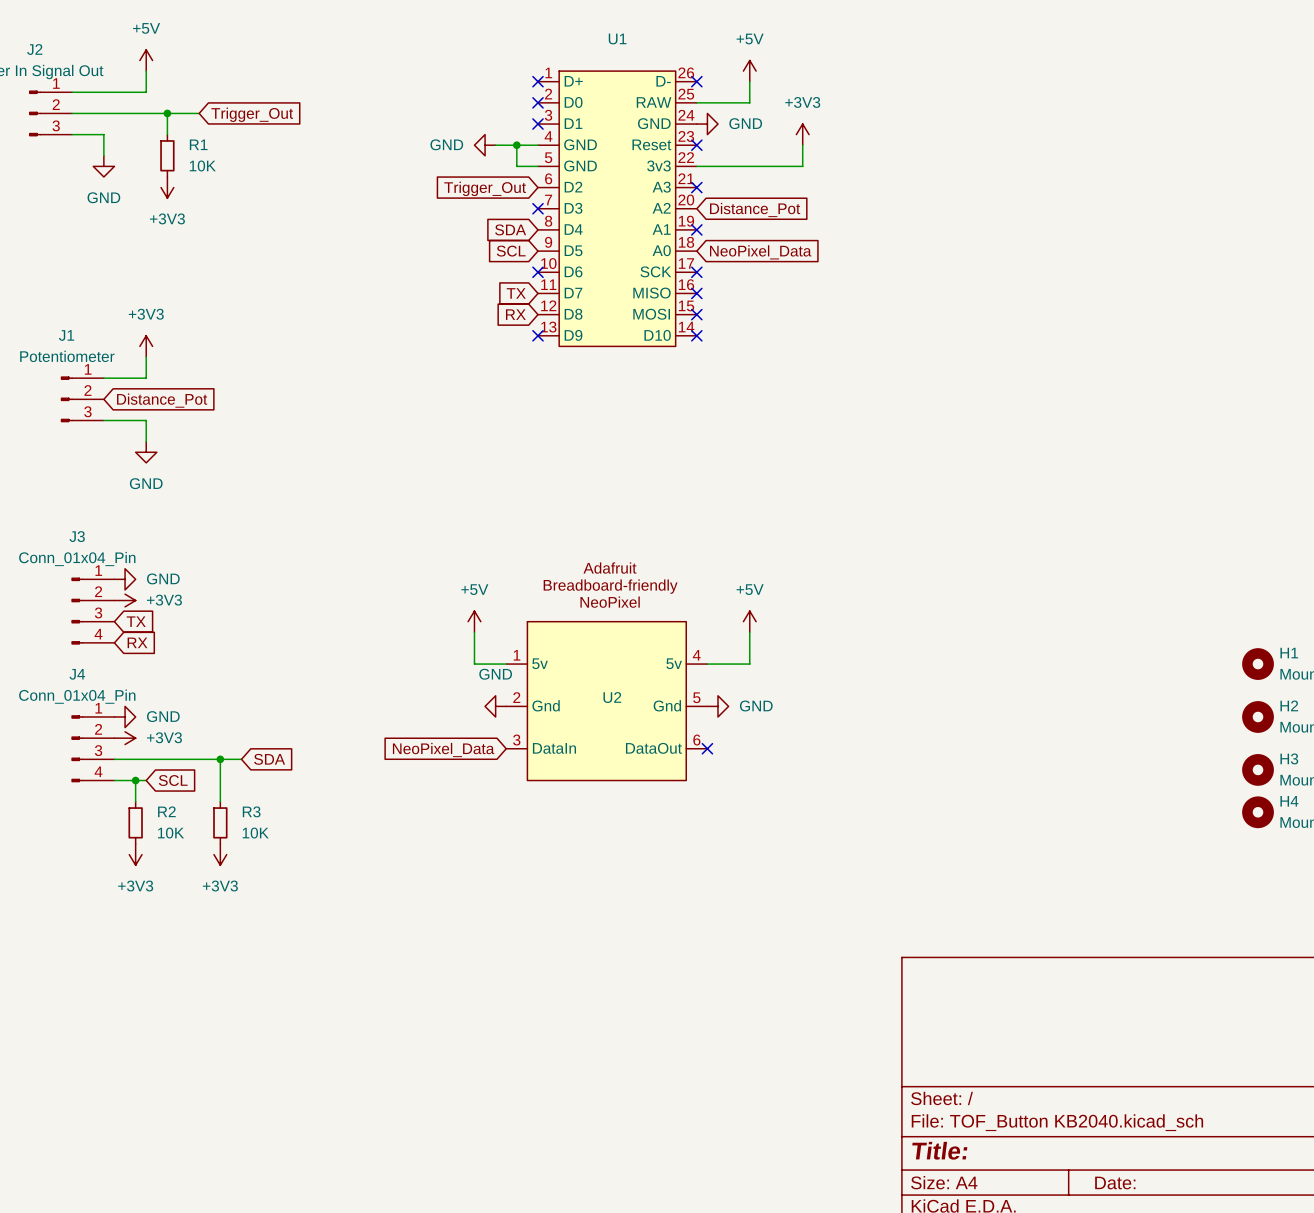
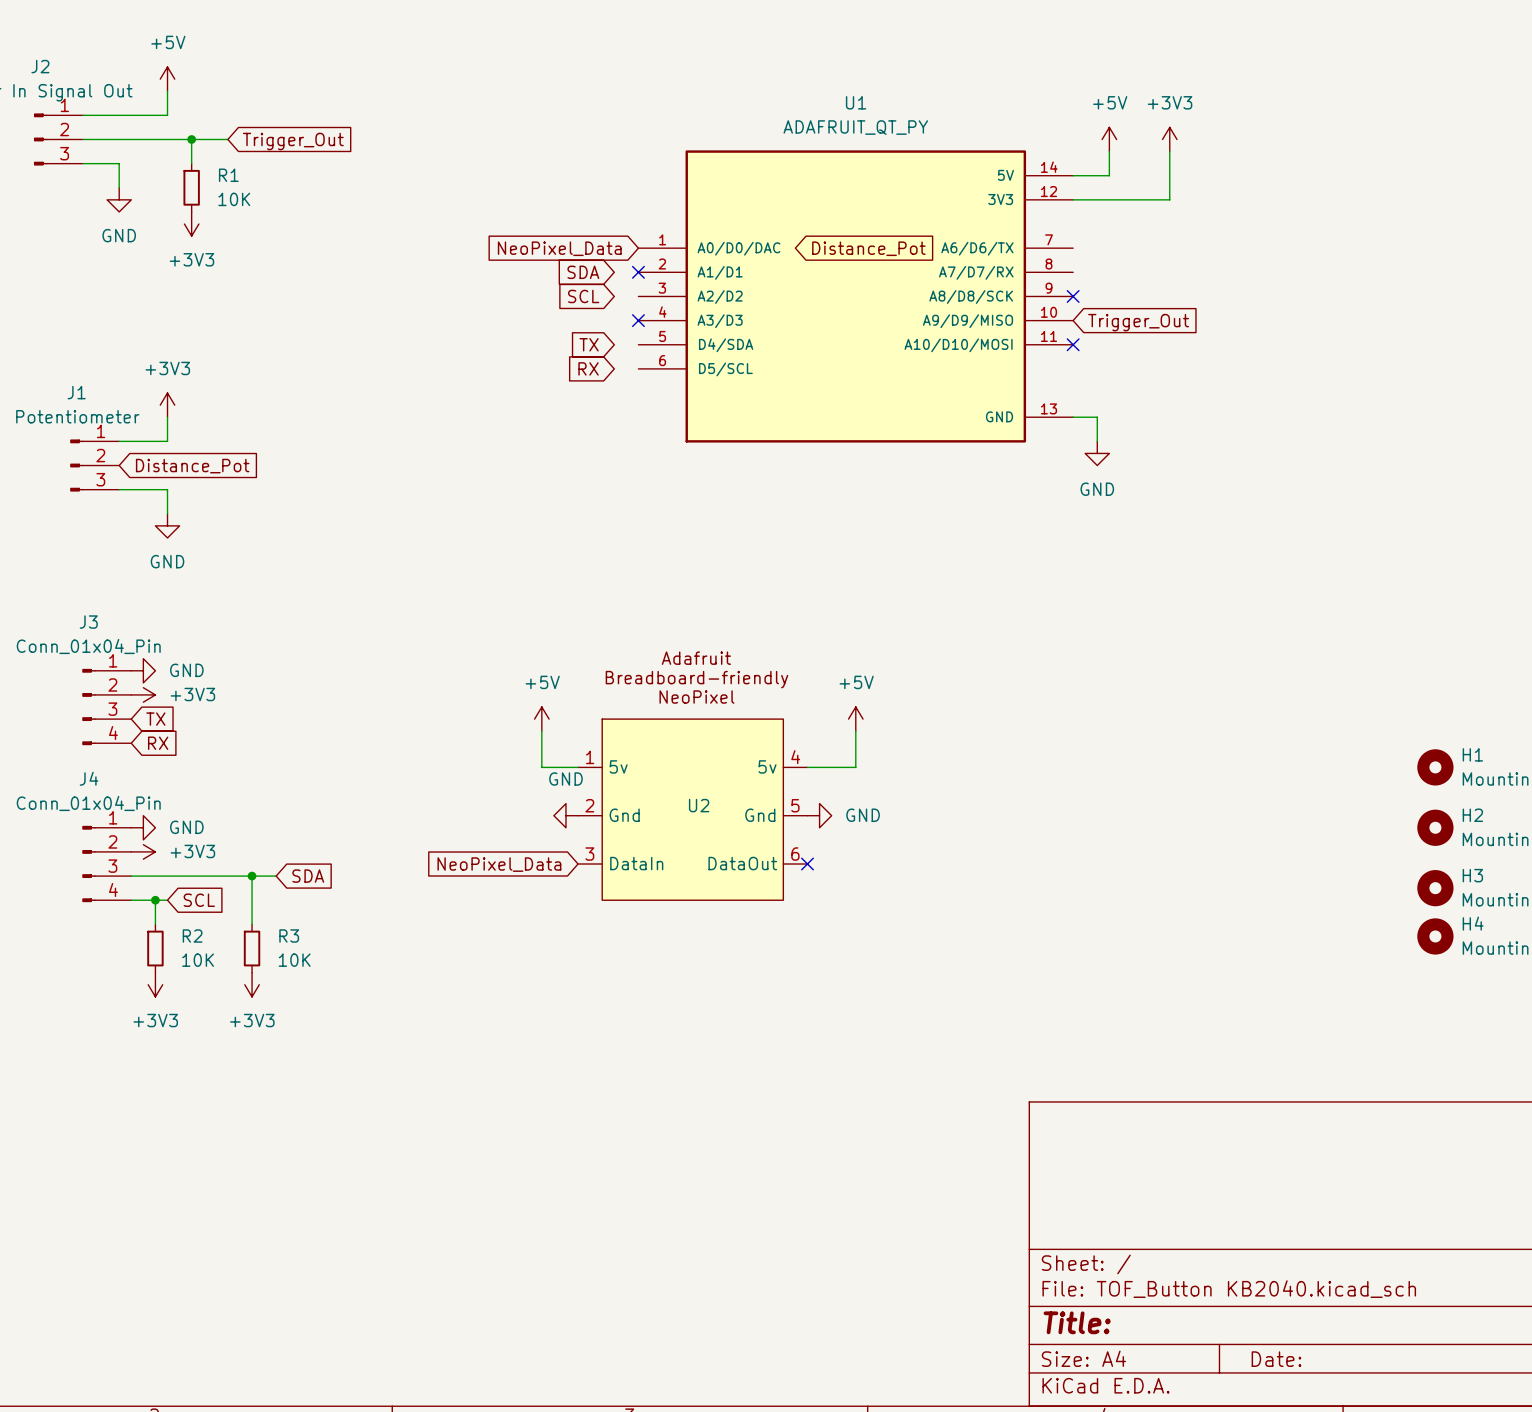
U1 symbol: [538, 71, 697, 347] -> [638, 150, 1074, 443]
power symbol: +5V (749, 71) -> none
no-connect mark: (538, 81) -> none
no-connect mark: (696, 81) -> none
wire: (749, 81) (749, 102) (696, 102) -> none
no-connect mark: (538, 102) -> none
U1 value: none -> ADAFRUIT_QT_PY (855, 127)
power symbol: none -> +5V (1109, 139)
power symbol: none -> +3V3 (1169, 139)
no-connect mark: (538, 124) -> none
power symbol: GND (707, 124) -> none
wire: none -> (1109, 151) (1109, 175) (1073, 175)
wire: none -> (1169, 151) (1169, 199) (1073, 199)
power symbol: +3V3 (802, 134) -> none
power symbol: GND (485, 145) -> none
wire: (495, 145) (538, 145) -> none
wire: (516, 145) (516, 166) (538, 166) -> none
junction: (516, 145) -> none
no-connect mark: (696, 145) -> none
no-connect mark: (696, 187) -> none
global label: Trigger_Out (485, 188) -> none
no-connect mark: (538, 208) -> none
no-connect mark: none -> (638, 272)
no-connect mark: (696, 229) -> none
no-connect mark: none -> (1073, 296)
global label rotation: 0° (760, 252) -> 180° (559, 248)
global label position: NeoPixel_Data (760, 252) -> NeoPixel_Data (559, 248)
no-connect mark position: (538, 272) -> (638, 320)
no-connect mark: (696, 272) -> none
global label: none -> Trigger_Out (1138, 322)
no-connect mark: (696, 293) -> none
no-connect mark: none -> (1073, 344)
no-connect mark: (696, 314) -> none
no-connect mark: (538, 335) -> none
no-connect mark: (696, 335) -> none
wire: none -> (1073, 417) (1097, 417) (1097, 441)
power symbol: none -> GND (1097, 453)

